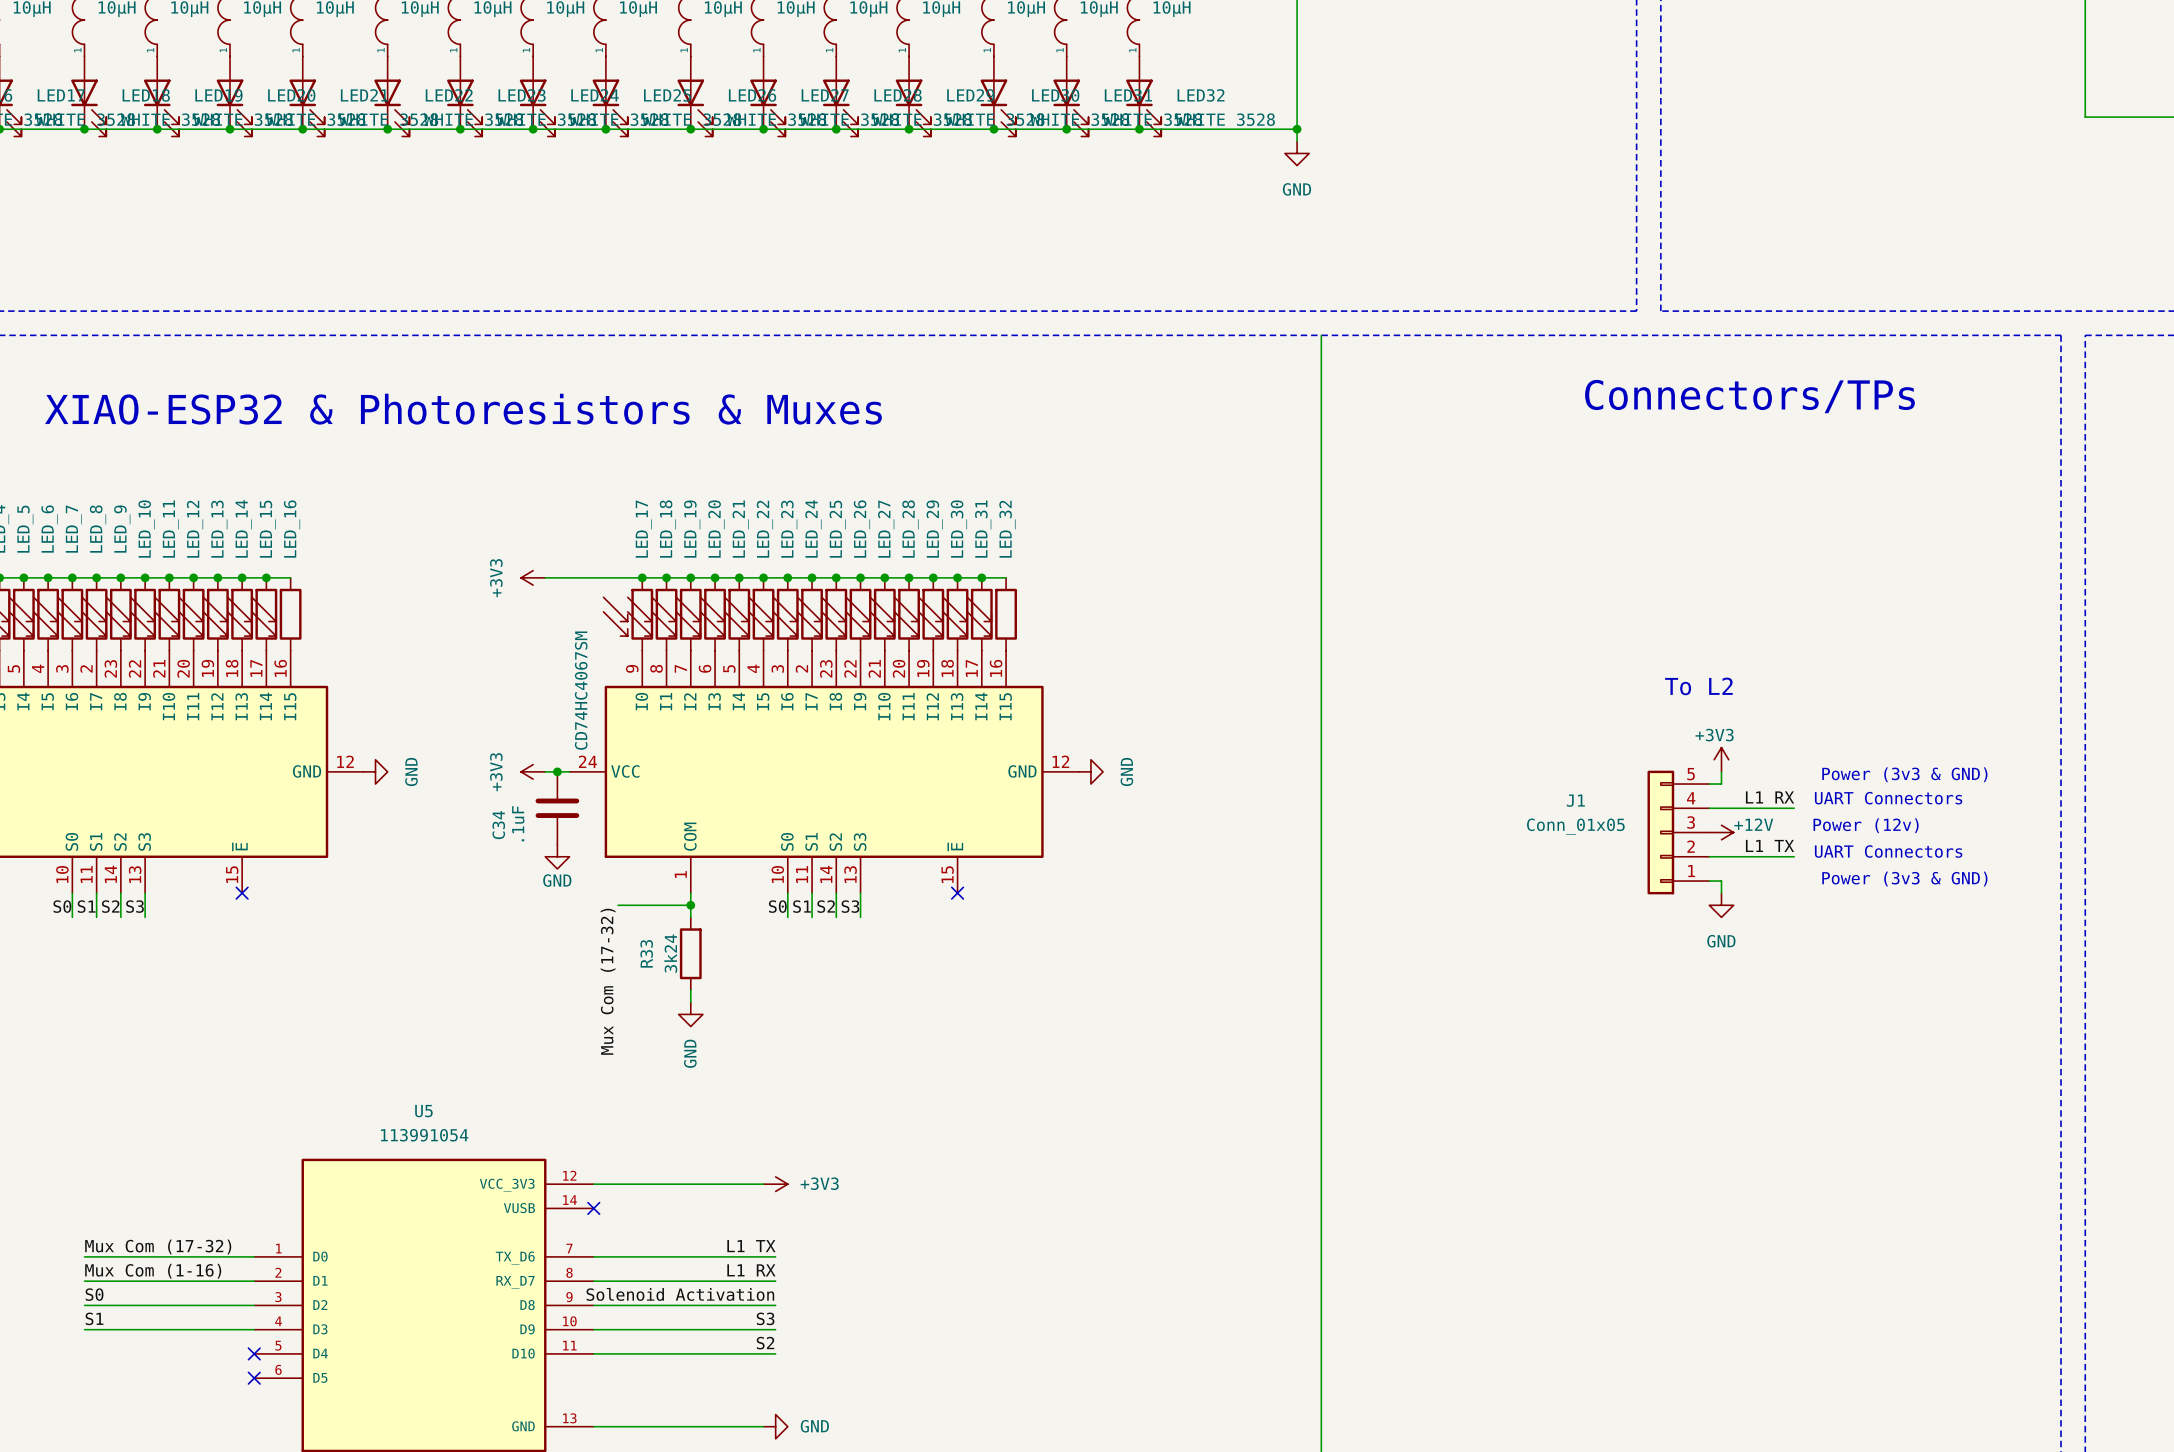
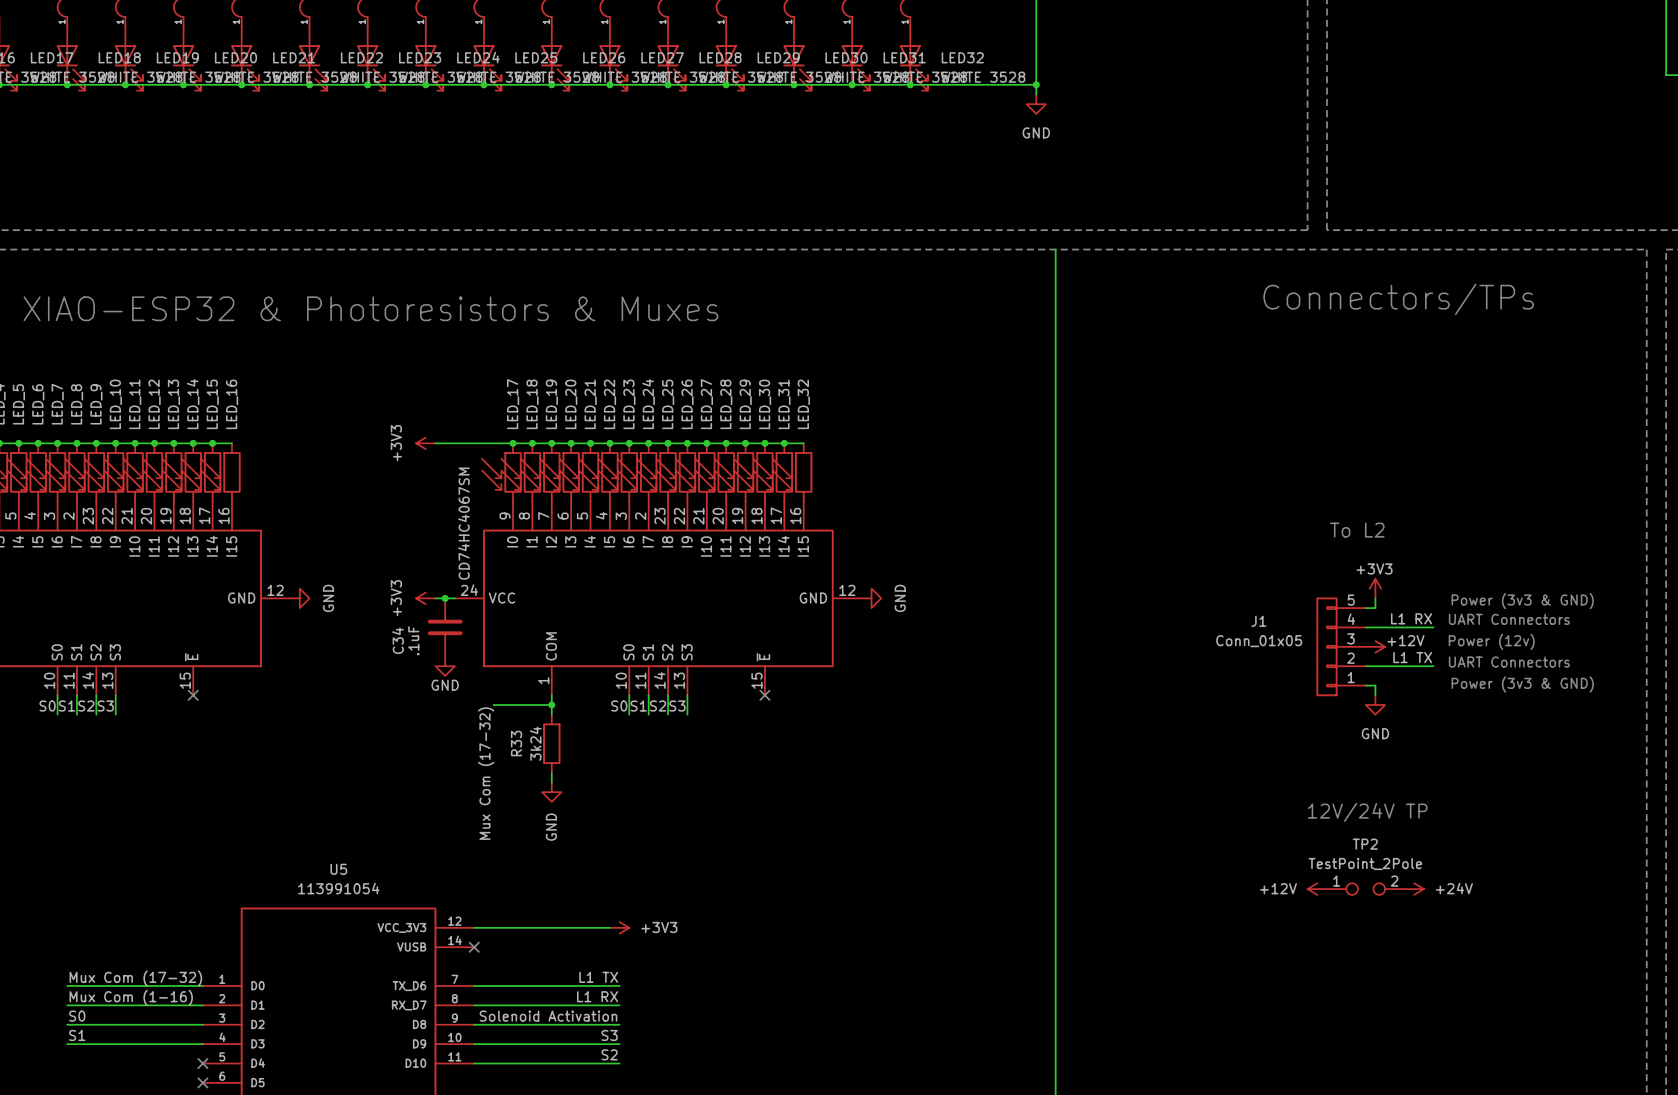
text: none -> 12V/24V TP (1367, 812)
power symbol: none -> +12V (1317, 889)
TP2: none -> TestPoint_2Pole (1365, 889)
power symbol: none -> +24V (1414, 889)

